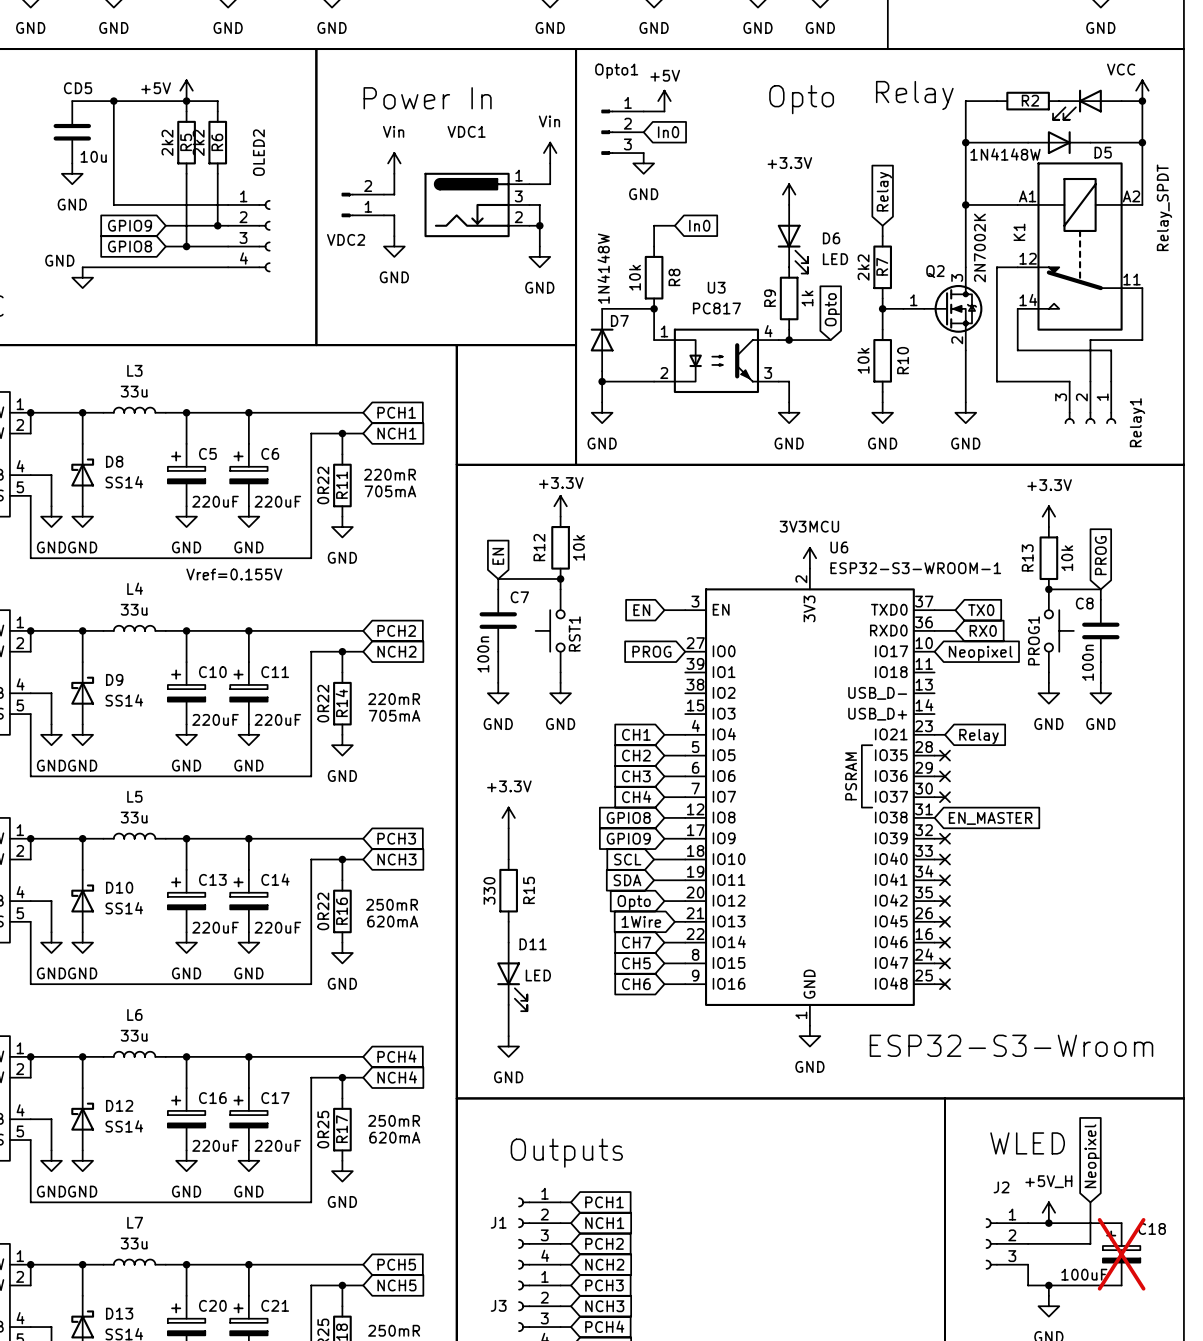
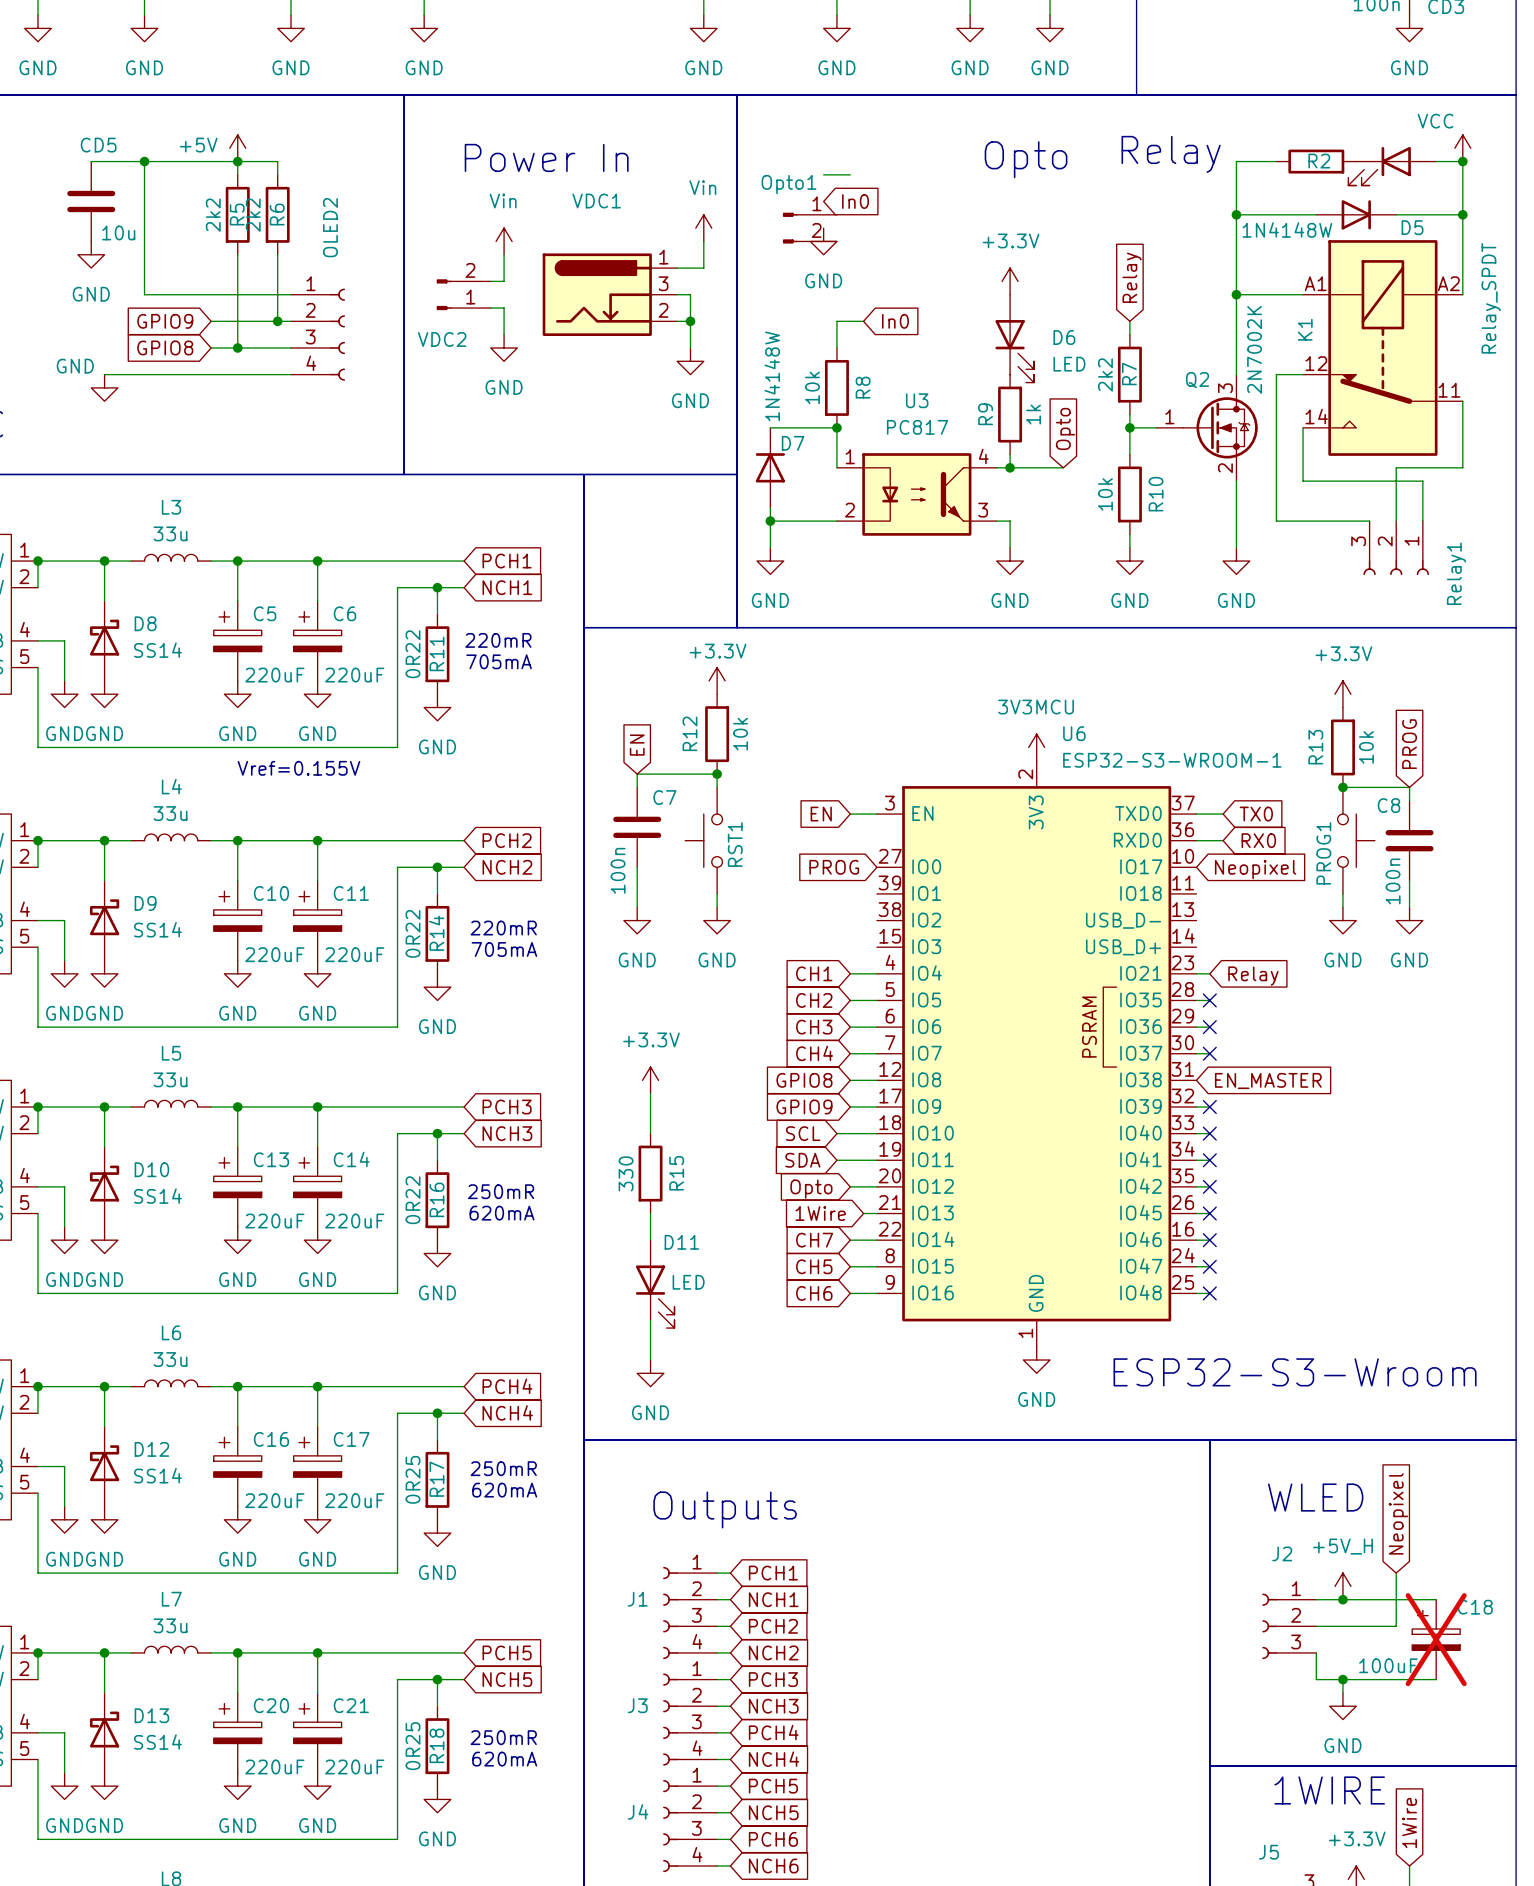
Opto1 name position: Opto1 (616, 71) -> Opto1 (789, 184)
power symbol: +5V (664, 101) -> none
Opto1 symbol: [601, 109, 644, 155] -> [782, 212, 837, 244]

